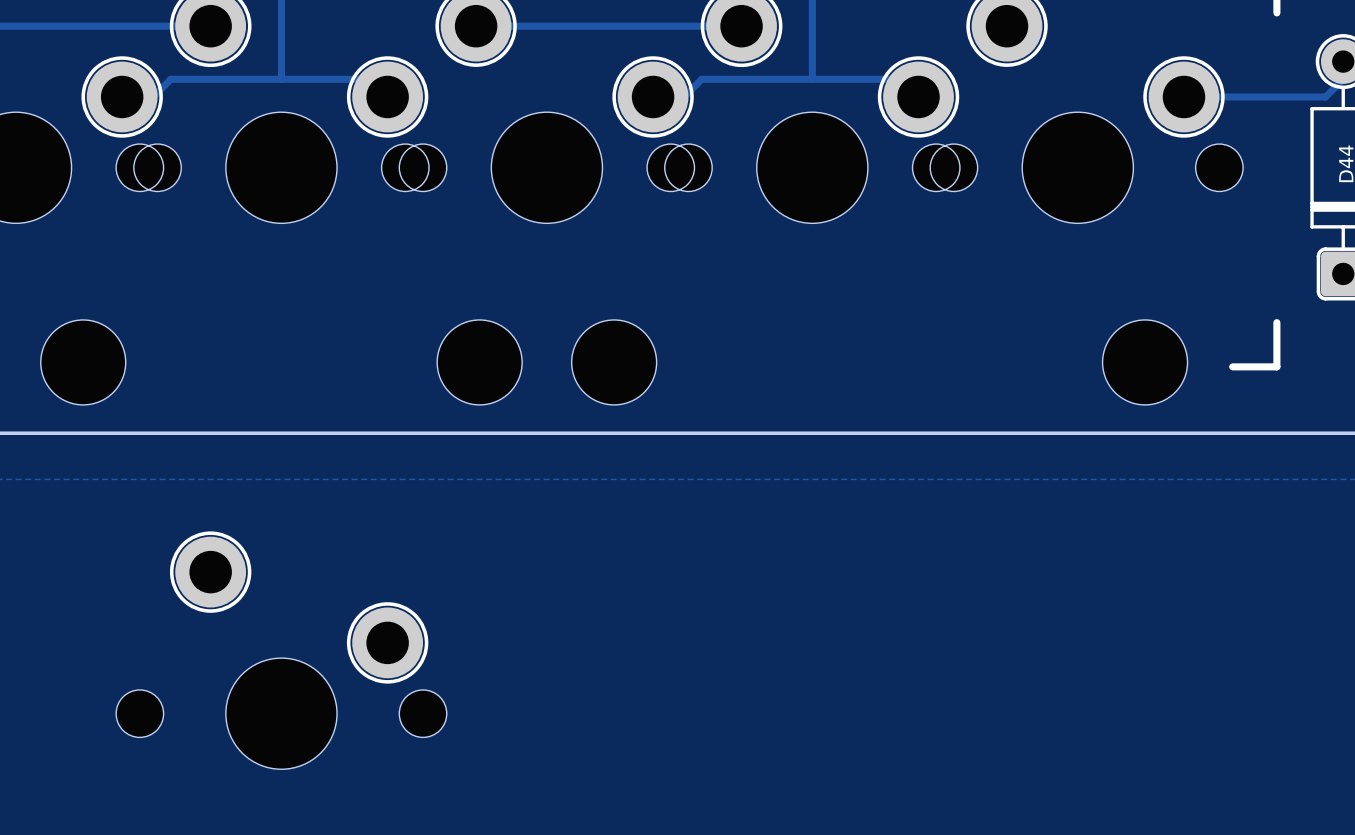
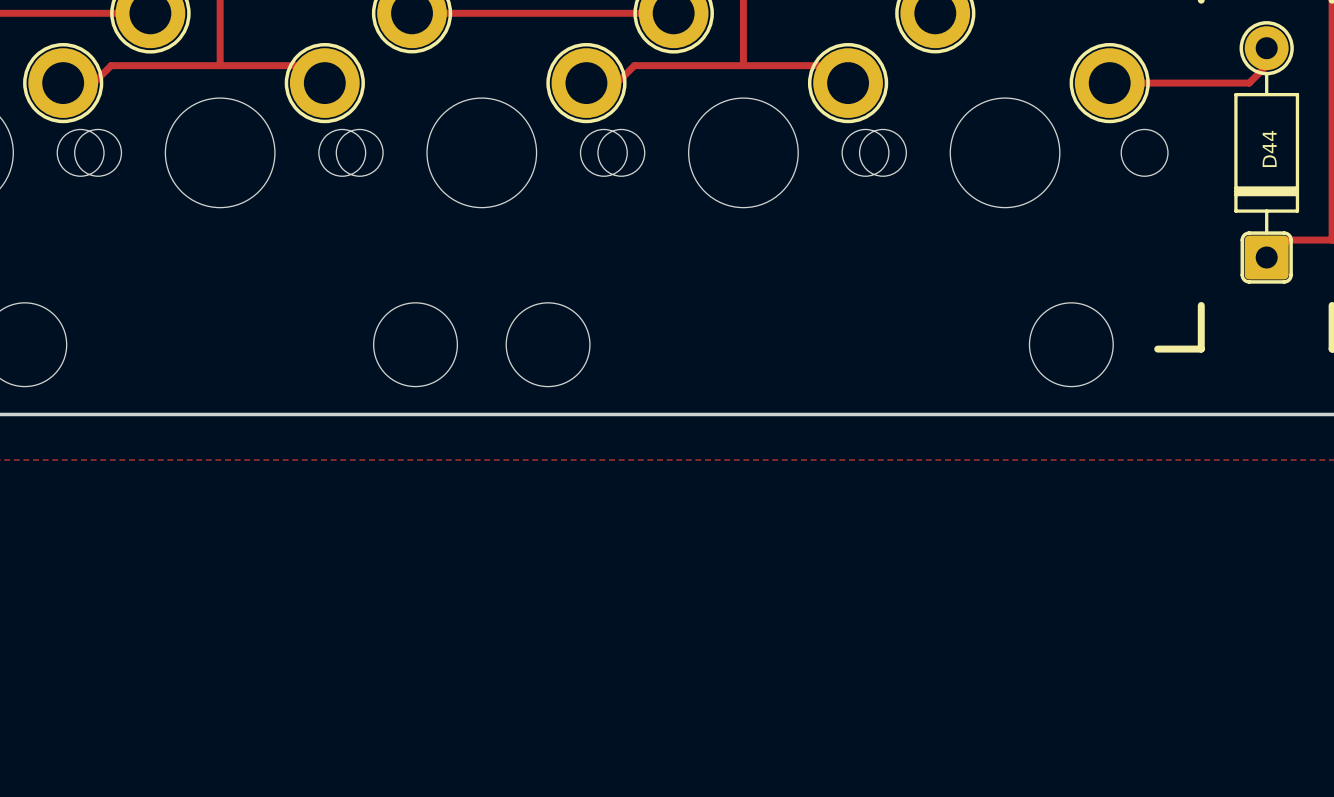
part: (281, 650) -> none

